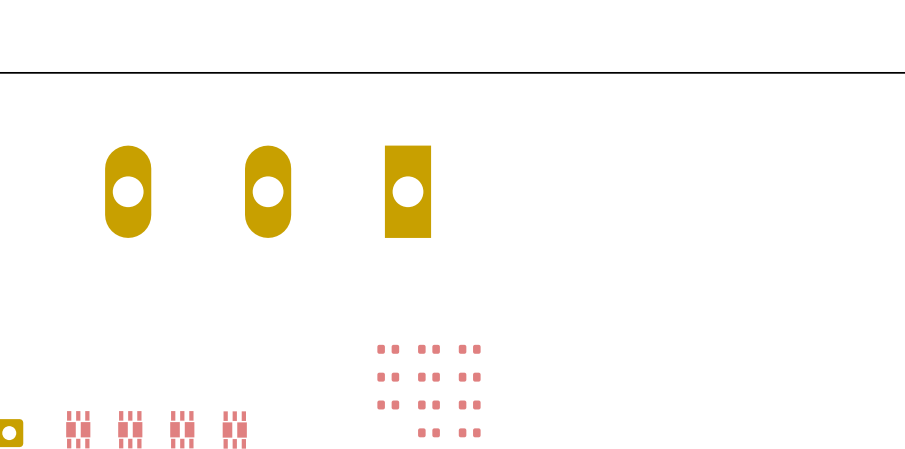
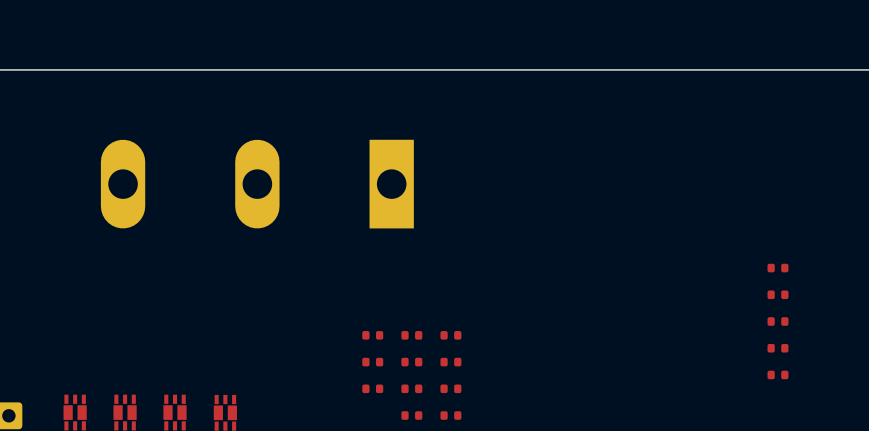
part: none -> (777, 268)
part: none -> (777, 294)
part: none -> (777, 321)
part: none -> (777, 348)
part: none -> (777, 374)

